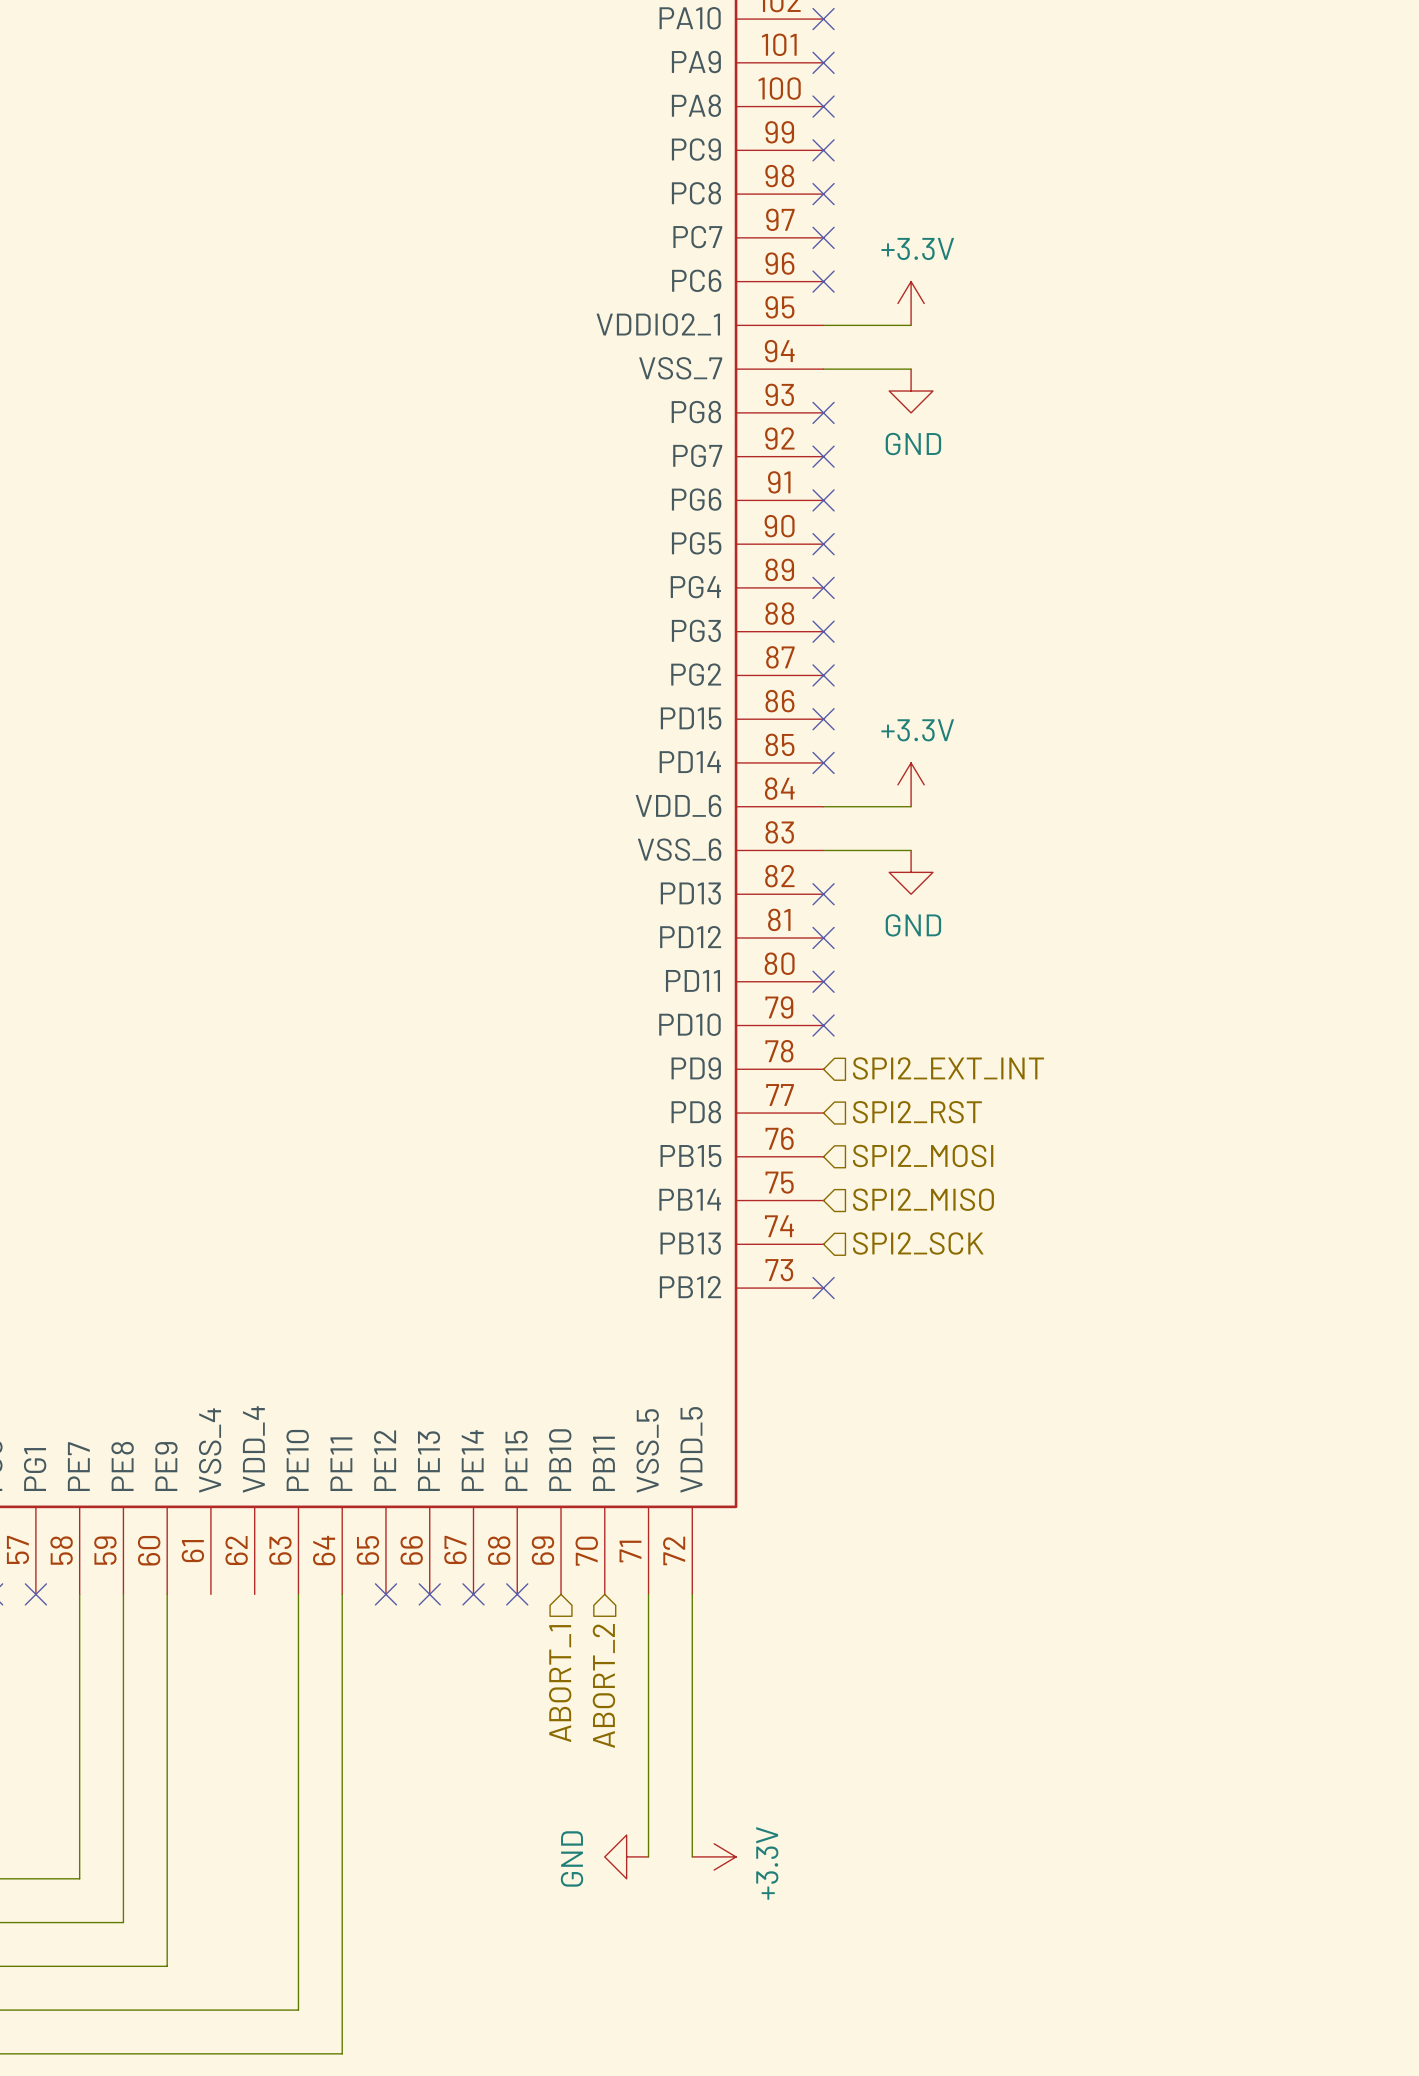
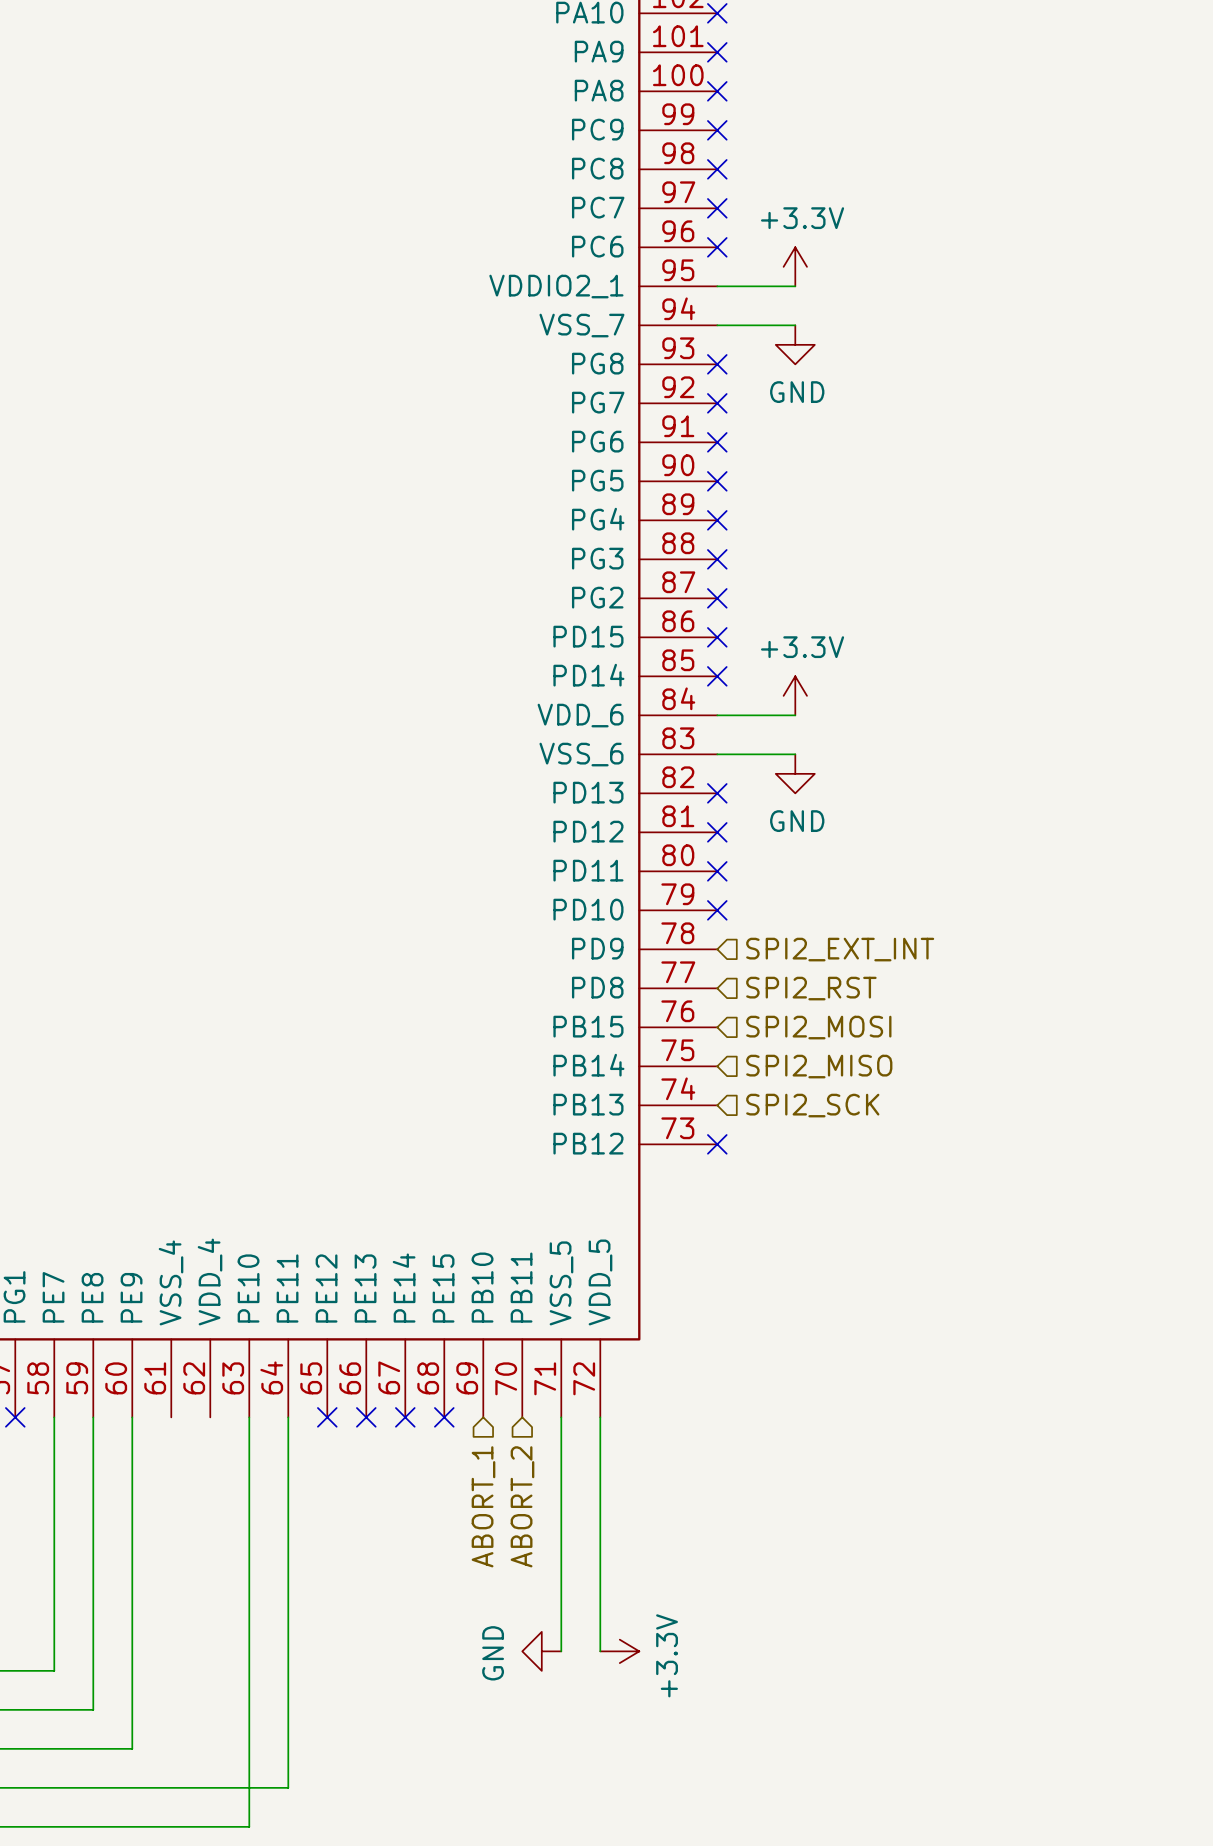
wire: (342, 2010) (342, 2053) (298, 2053) -> (288, 1787) (249, 1787) (249, 1826)

